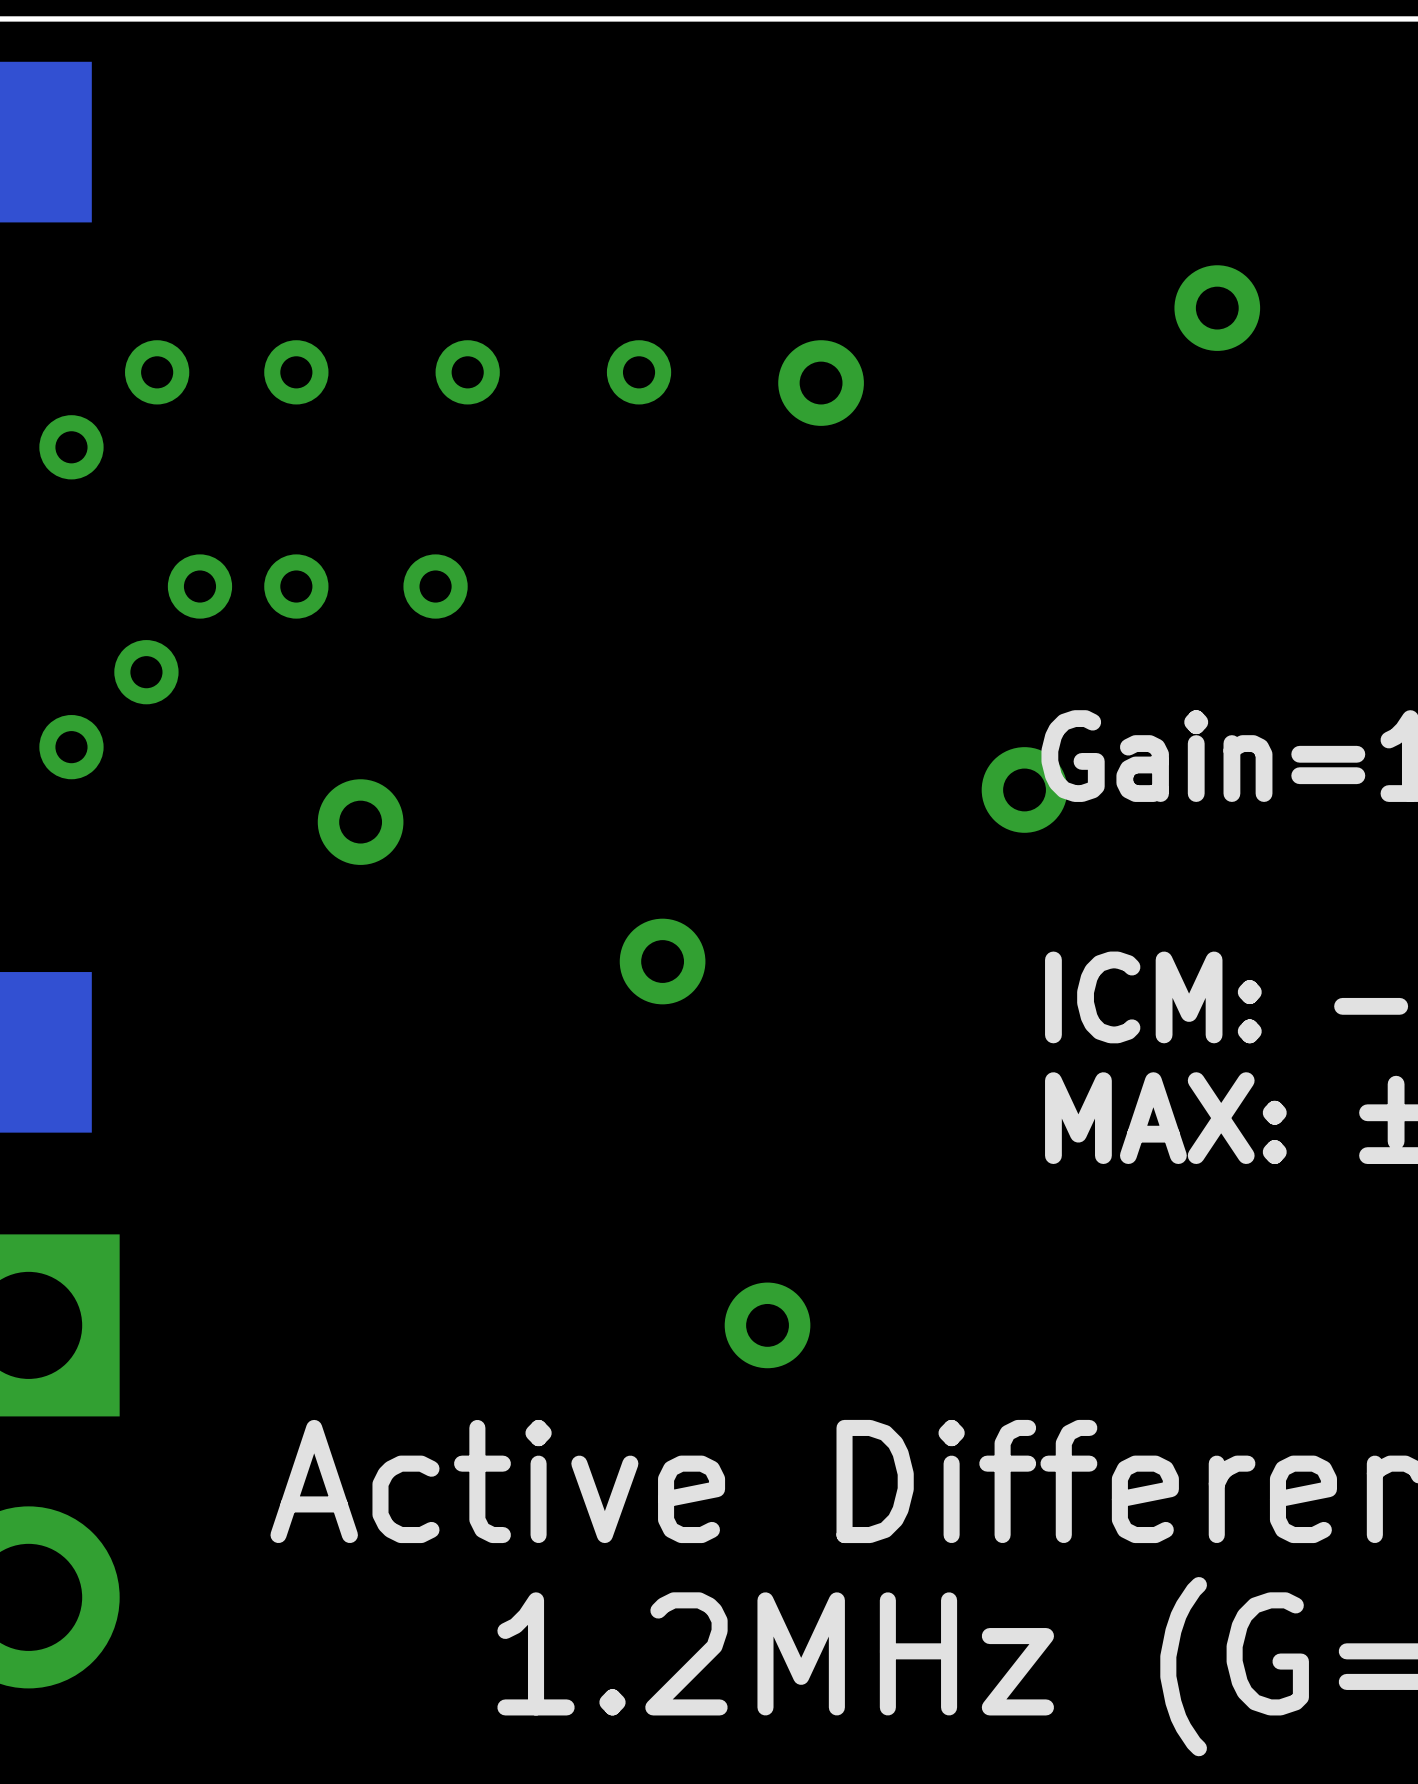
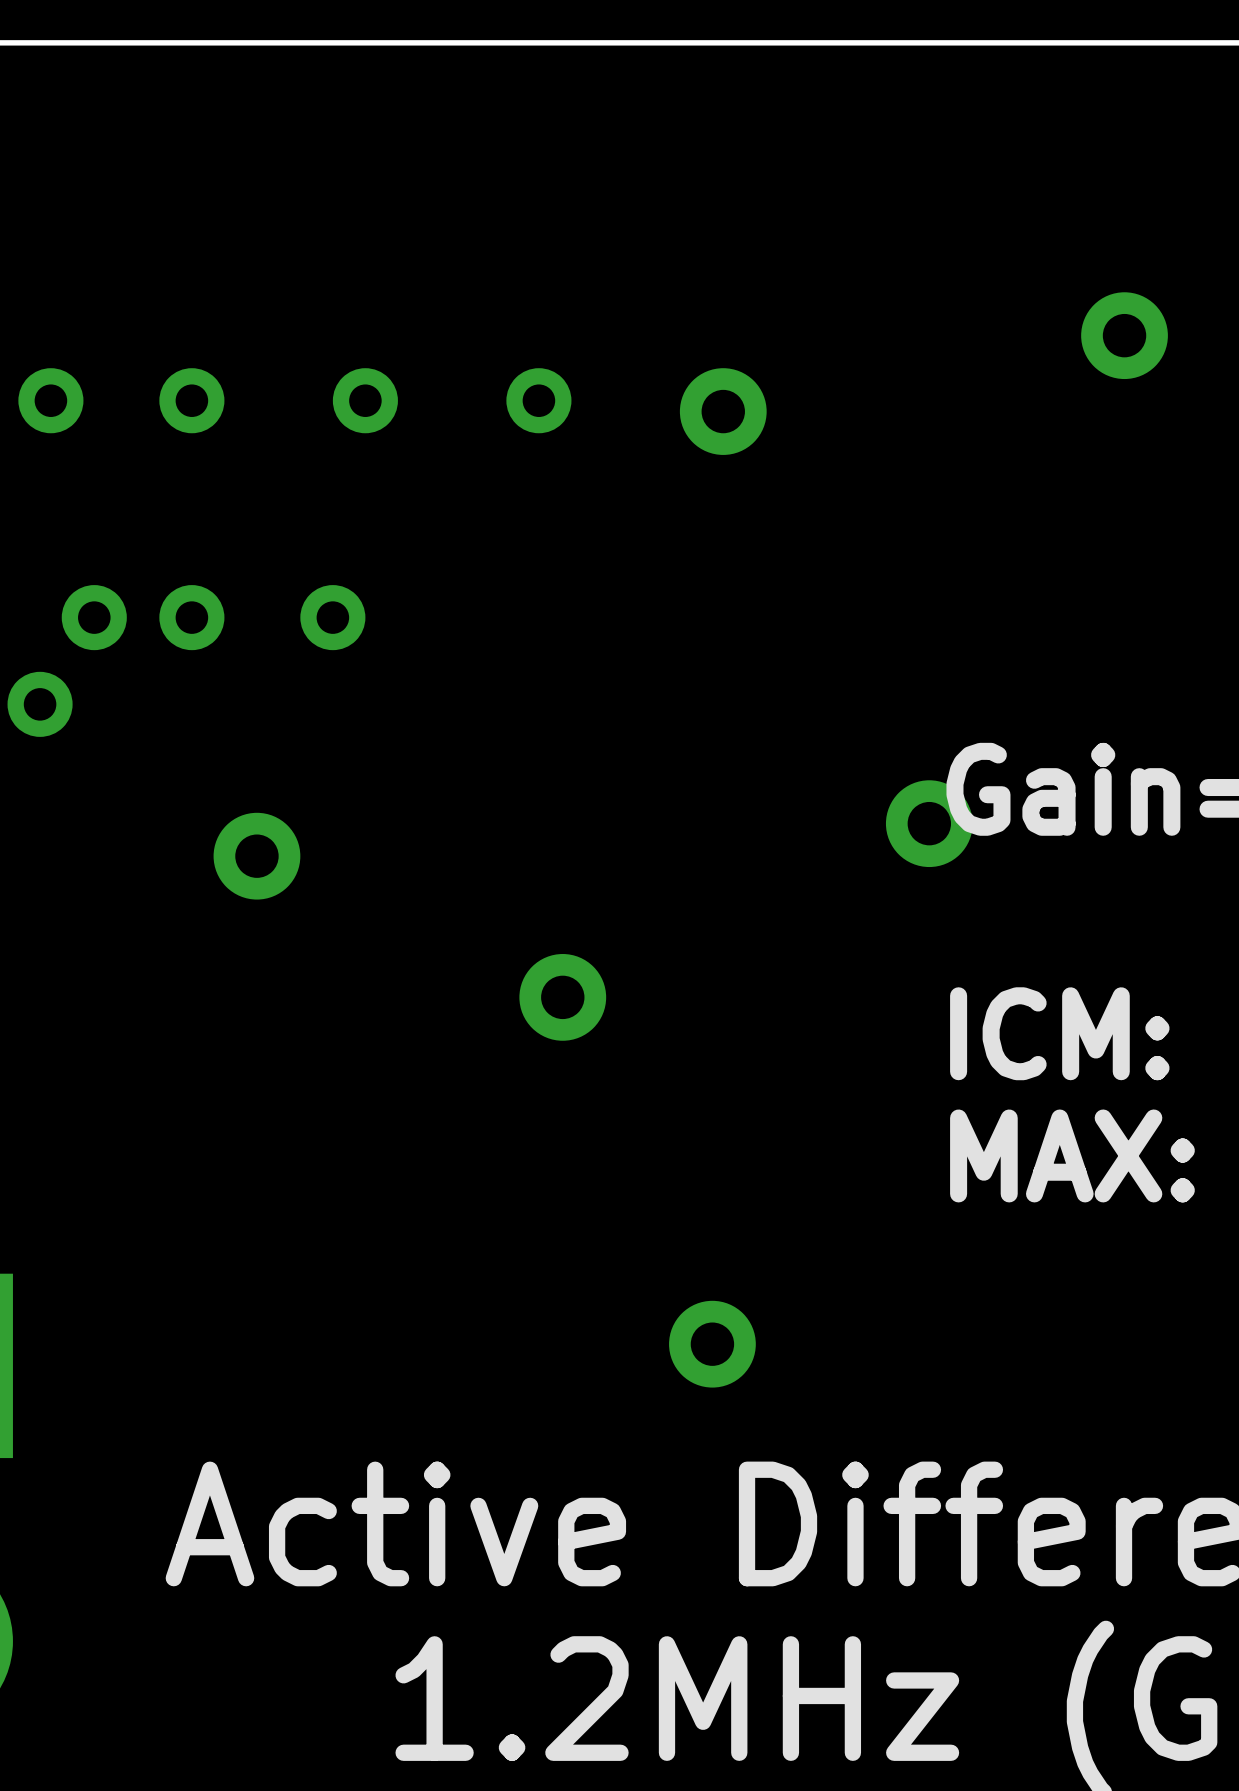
via position: (767, 1325) -> (712, 1344)

